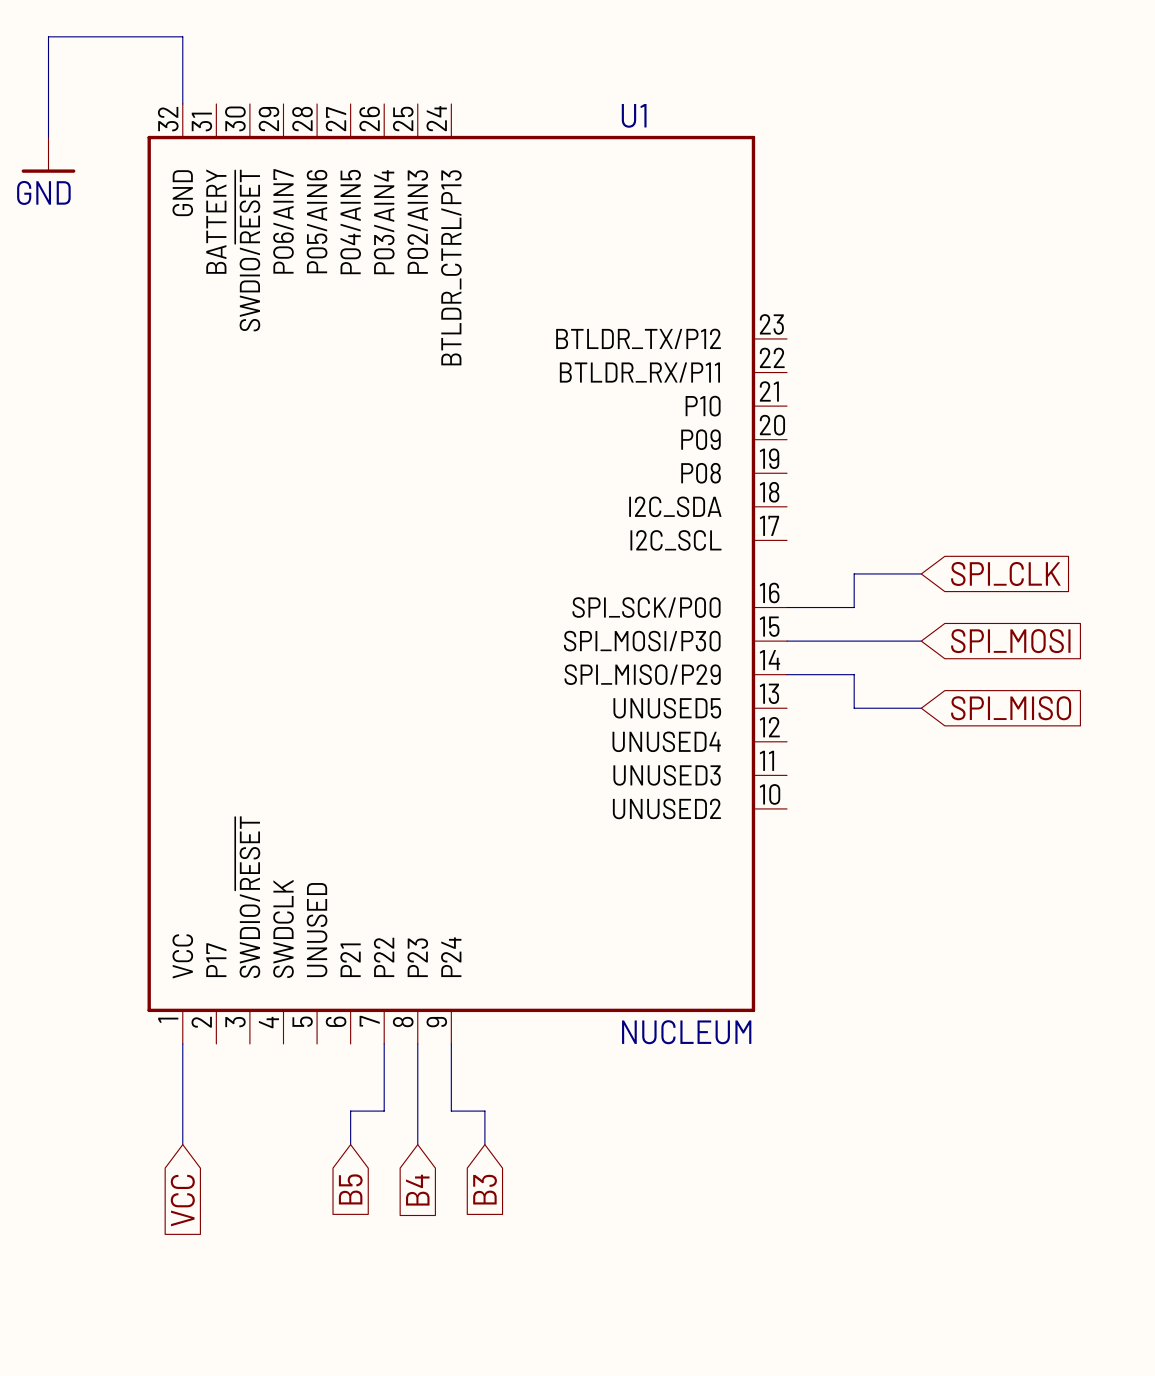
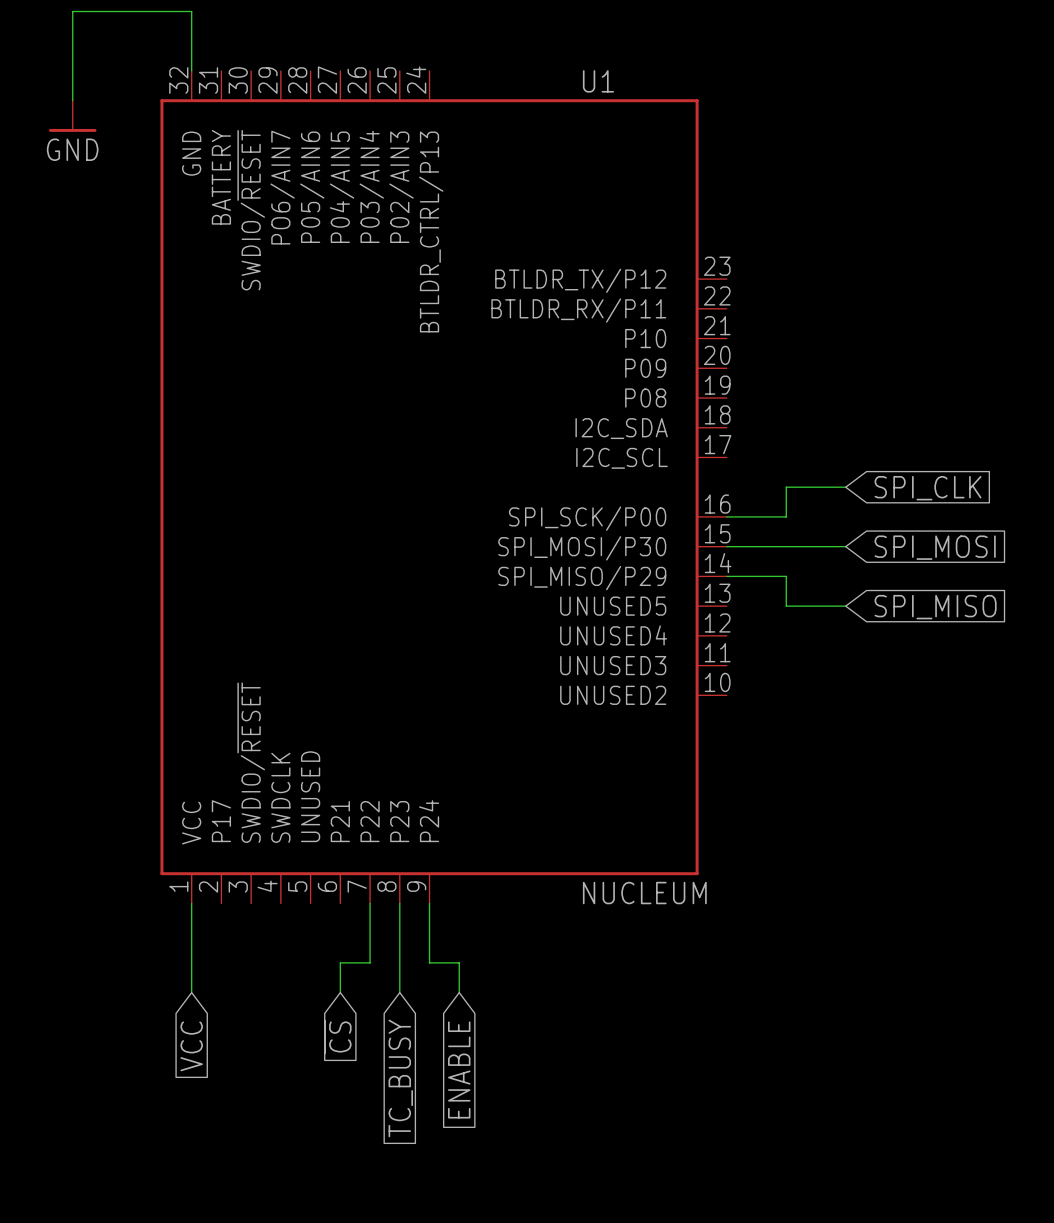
global label: B5 (350, 1189) -> ~{CS} (337, 1036)
global label: B3 (485, 1189) -> ENABLE (459, 1069)
global label: B4 (417, 1190) -> TC_BUSY (400, 1078)

